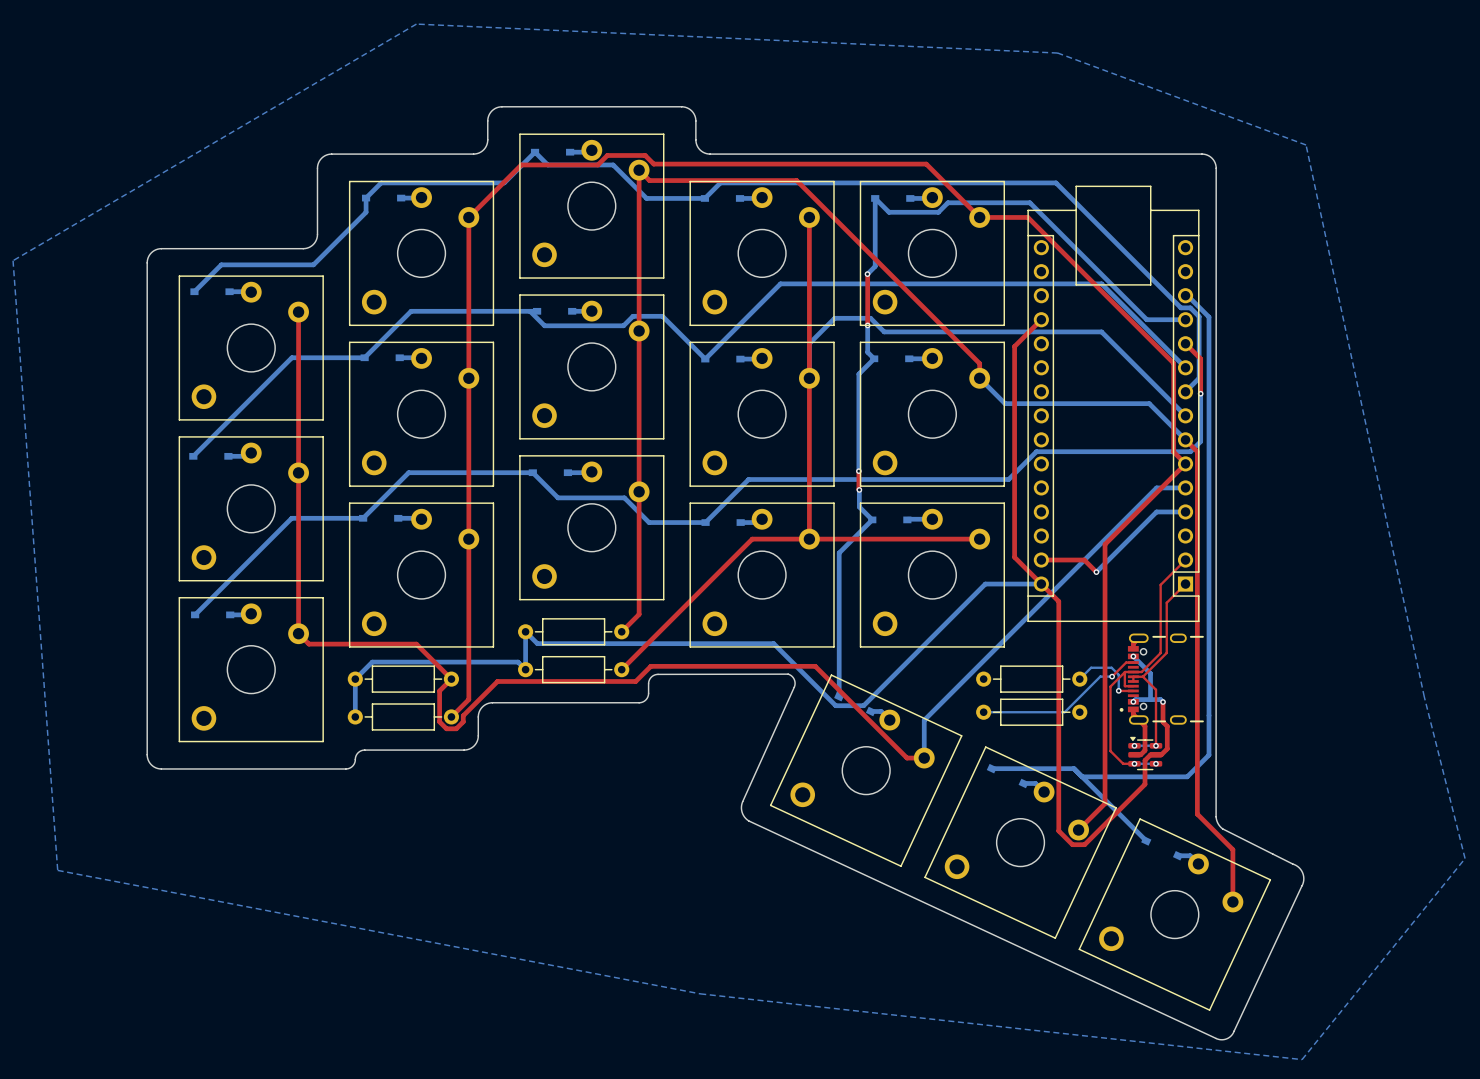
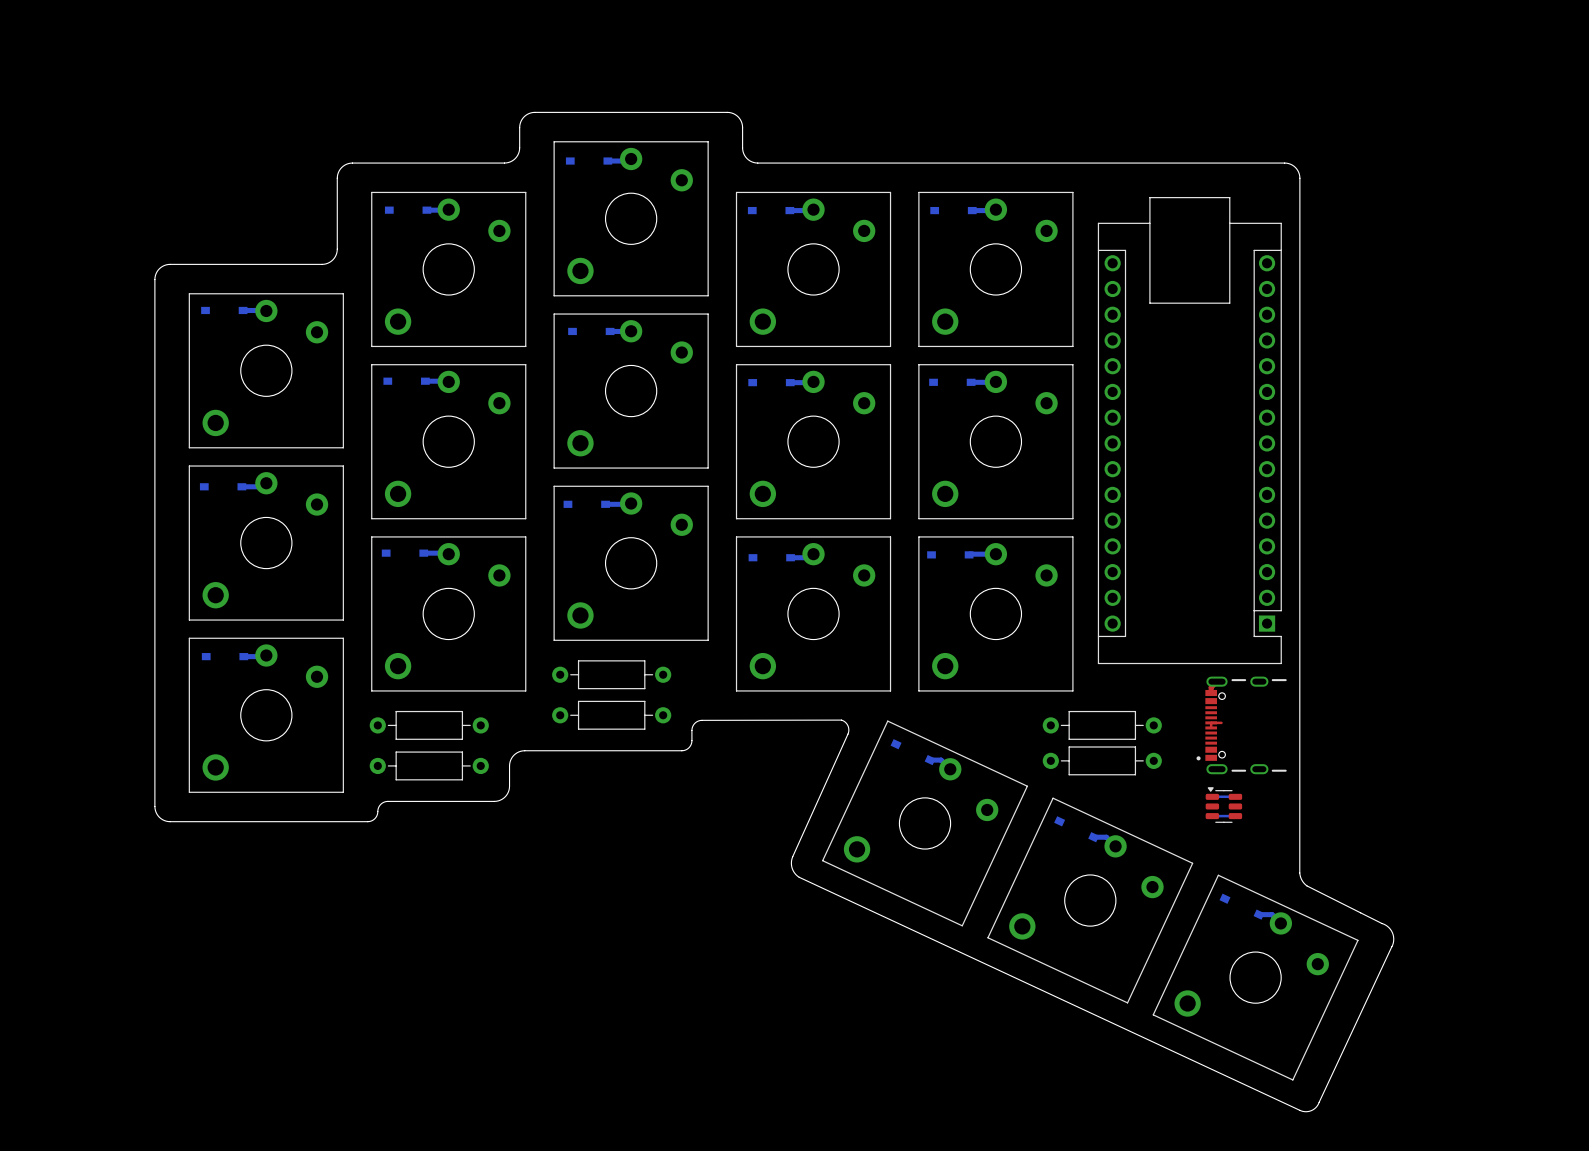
bottom zone outline: (416, 24) (1057, 53) (1306, 145) (1424, 696) (1465, 858) (1302, 1059) (700, 993) (57, 870) (13, 260) (416, 24) -> none
top track: (809, 217) (809, 539) -> none
bottom track: (867, 274) (875, 266) (875, 198) (889, 212) (938, 212) (947, 202) (1029, 202) (1146, 319) (1185, 319) -> none
top track: (867, 274) (867, 325) -> none
via: (867, 274) -> none
bottom track: (194, 291) (221, 264) (313, 264) (366, 212) (366, 198) (381, 182) (504, 182) (535, 152) (547, 164) (613, 164) (646, 198) (704, 198) (720, 182) (1056, 182) (1180, 307) (1190, 307) (1199, 316) (1199, 378) (1185, 391) -> none
bottom track: (1185, 295) (1209, 317) (1209, 755) (1187, 776) (1082, 776) -> none
bottom track: (530, 311) (544, 325) (623, 325) (633, 316) (662, 316) (705, 359) (780, 283) (1101, 283) (1185, 367) -> none
bottom track: (537, 311) (411, 311) (364, 357) (291, 357) (193, 456) -> none
top track: (298, 312) (298, 633) (308, 644) (416, 644) (451, 679) (439, 690) (439, 721) (446, 728) (456, 728) (463, 721) (463, 715) (497, 681) (635, 681) (650, 666) (815, 666) (907, 758) (924, 758) -> none
top track: (1041, 319) (1014, 346) (1014, 557) (1058, 601) (1058, 830) (1072, 844) (1084, 844) (1145, 784) (1145, 760) (1150, 754) (1161, 754) (1167, 748) (1167, 726) (1163, 722) (1163, 702) -> none
bottom track: (867, 325) (867, 352) (874, 358) (858, 374) (858, 471) -> none
via: (867, 325) -> none
top track: (1185, 343) (1200, 358) (1200, 393) -> none
bottom track: (809, 378) (809, 343) (834, 318) (870, 318) (884, 331) (1101, 331) (1185, 415) -> none
bottom track: (979, 378) (1005, 403) (1149, 403) (1185, 439) -> none
top track: (979, 378) (979, 363) (796, 180) (649, 180) (639, 170) (639, 614) (621, 631) -> none
bottom track: (1200, 393) (1200, 441) (1190, 451) (1036, 451) (1008, 479) (748, 479) (705, 522) (649, 522) (624, 497) (558, 497) (532, 472) (408, 472) (363, 518) (291, 518) (195, 614) -> none
via: (1200, 393) -> none
top track: (1185, 439) (1197, 451) (1197, 814) (1232, 849) (1232, 901) -> none
top track: (858, 471) (859, 489) -> none
via: (858, 471) -> none
bottom track: (1185, 487) (1156, 487) (924, 720) (924, 758) -> none
bottom track: (859, 489) (859, 506) (872, 519) (839, 552) (839, 696) -> none
via: (859, 489) -> none
bottom track: (1185, 511) (1156, 511) (1096, 572) -> none
top track: (979, 539) (752, 539) (621, 669) -> none
top track: (1041, 560) (1084, 560) (1096, 572) -> none
top track: (1185, 560) (1160, 584) (1160, 653) (1141, 672) (1125, 672) (1110, 686) (1110, 751) (1123, 763) (1134, 763) -> none
via: (1096, 572) -> none
bottom track: (1041, 584) (985, 584) (863, 705) (835, 705) (773, 643) (537, 643) (525, 631) (525, 669) (518, 662) (372, 662) (355, 679) (355, 716) -> none
top track: (1185, 584) (1166, 602) (1166, 652) (1142, 676) (1156, 689) (1156, 745) -> none
bottom track: (1133, 656) (1150, 673) (1150, 699) -> none
via: (1133, 656) -> none
top track: (1133, 662) (1126, 662) (1112, 676) -> none
top track: (1124, 672) (1124, 685) (1133, 686) -> none
bottom track: (1112, 676) (1100, 676) (1064, 712) (983, 712) -> none
via: (1112, 676) -> none
bottom track: (1079, 679) (1091, 667) (1111, 667) (1118, 674) (1118, 690) -> none
top track: (1118, 690) (1133, 690) -> none
via: (1118, 690) -> none
bottom track: (1133, 701) (1135, 699) (1160, 699) (1163, 702) -> none
via: (1133, 701) -> none
via: (1163, 702) -> none
top track: (1133, 709) (1133, 714) (1145, 726) (1145, 750) (1140, 754) (1134, 754) -> none
top track: (451, 716) (468, 699) (468, 217) (521, 164) (597, 164) (607, 155) (645, 155) (653, 164) (926, 164) (979, 217) (1027, 217) (1173, 363) (1173, 452) (1185, 463) (1105, 544) (1105, 803) (1078, 830) -> none
via: (1134, 745) -> none
via: (1156, 745) -> none
via: (1134, 763) -> none
via: (1156, 763) -> none
bottom track: (991, 768) (1074, 768) (1146, 840) -> none

